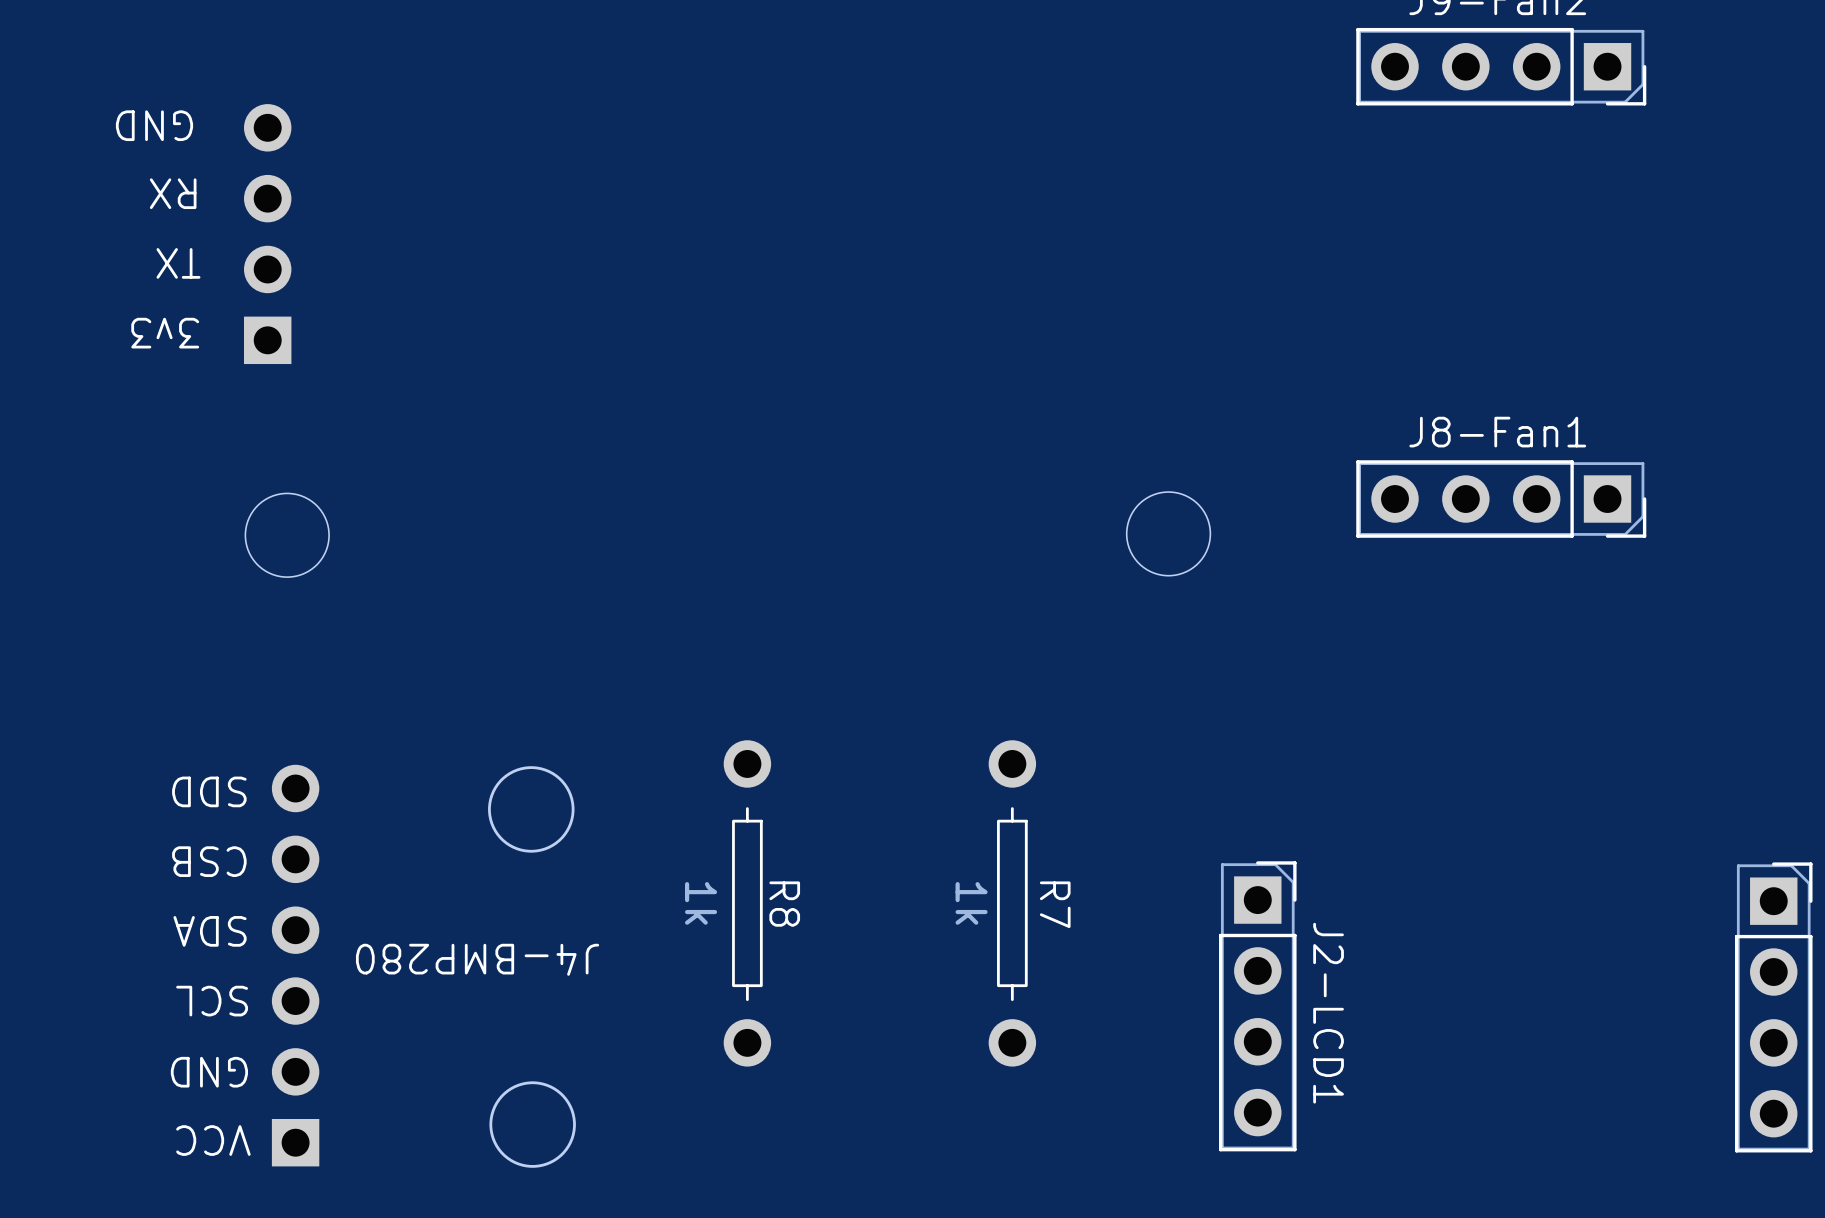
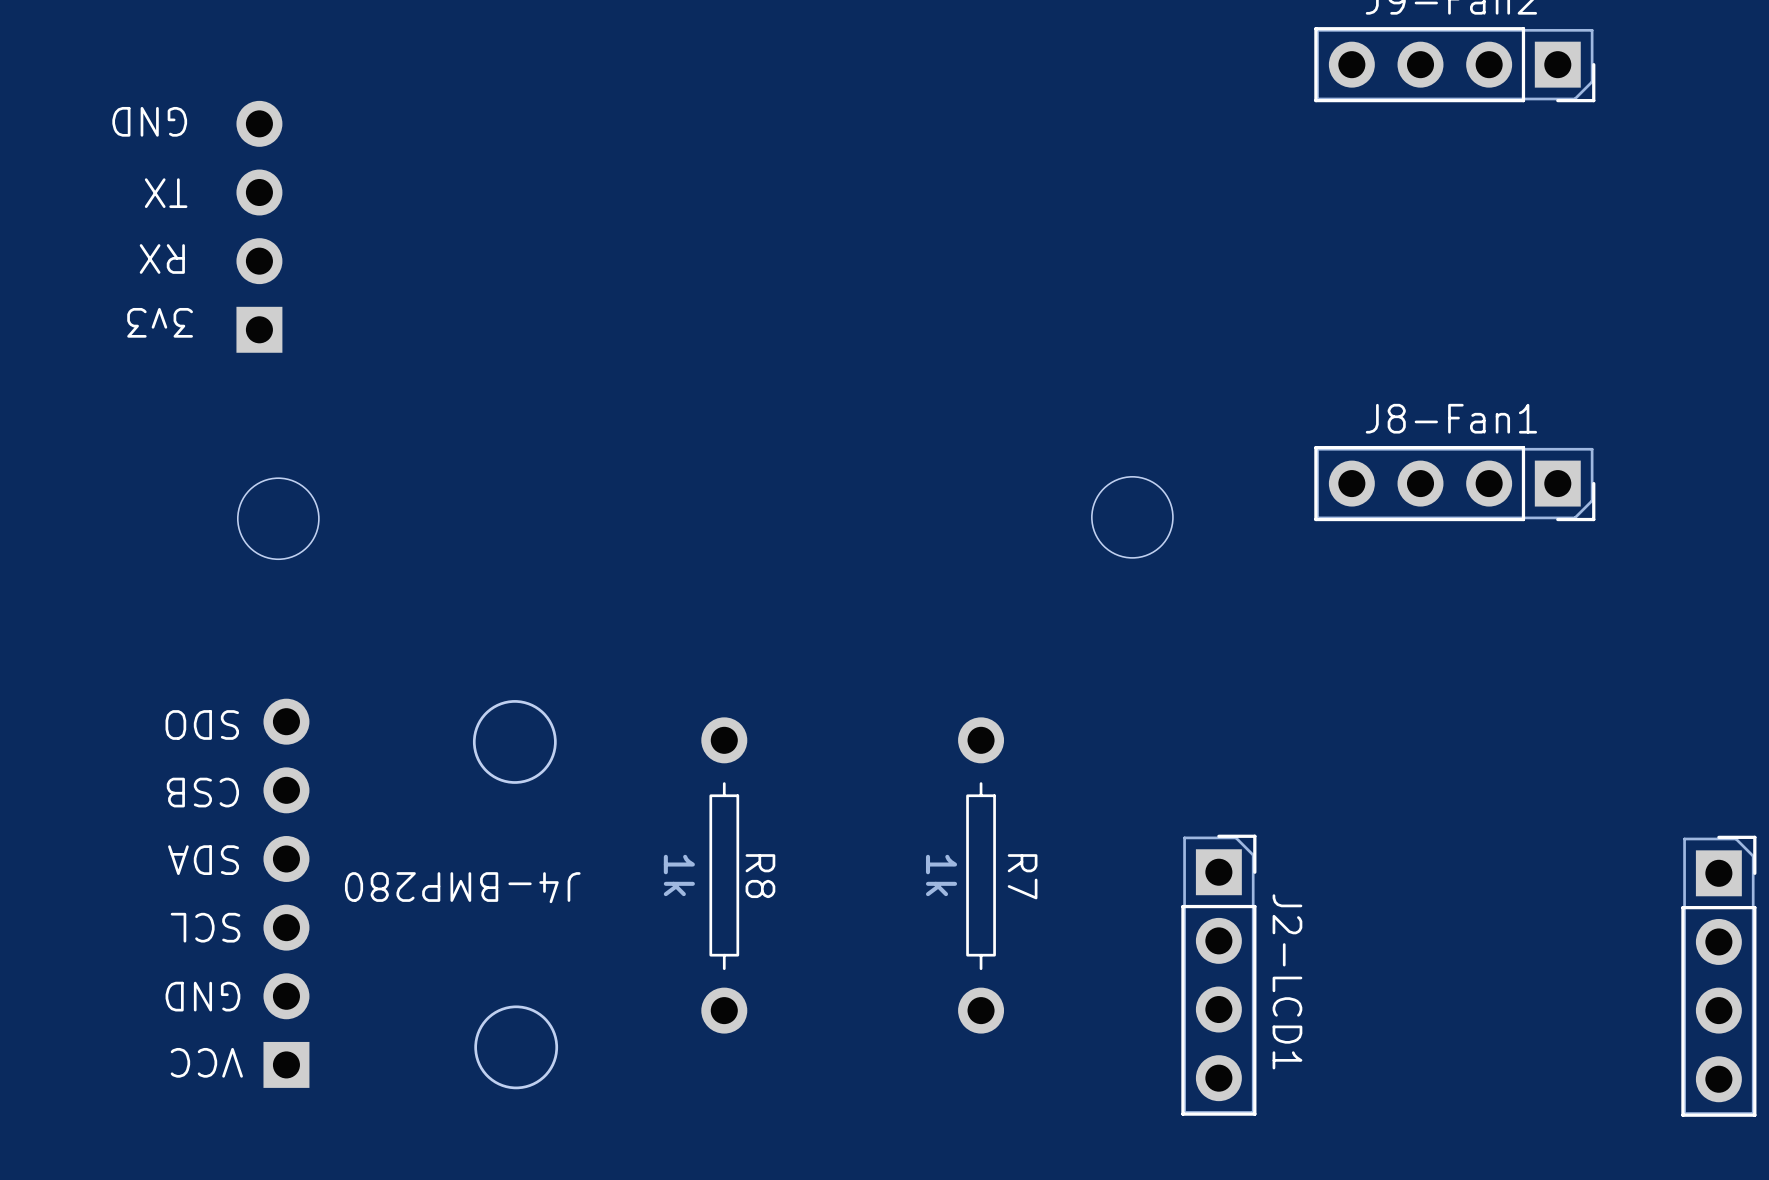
part text position: RX (173, 193) -> RX (162, 258)
part text position: TX (178, 263) -> TX (166, 193)
J4-BMP280 text: SDD (209, 791) -> SDO (202, 724)
J4-BMP280 position: (423, 966) -> (410, 893)

